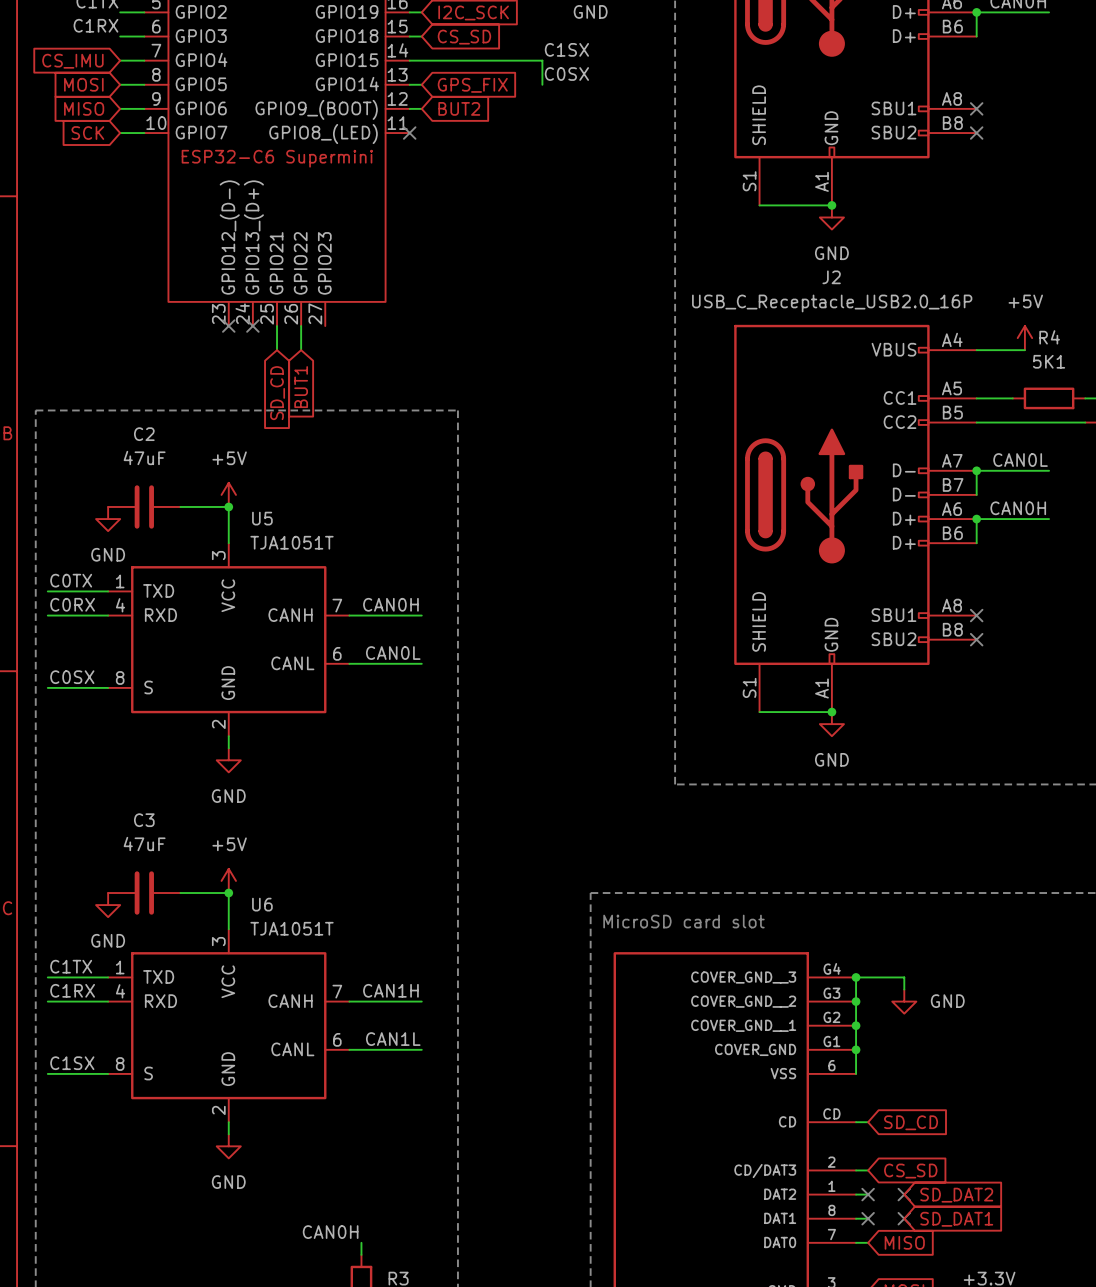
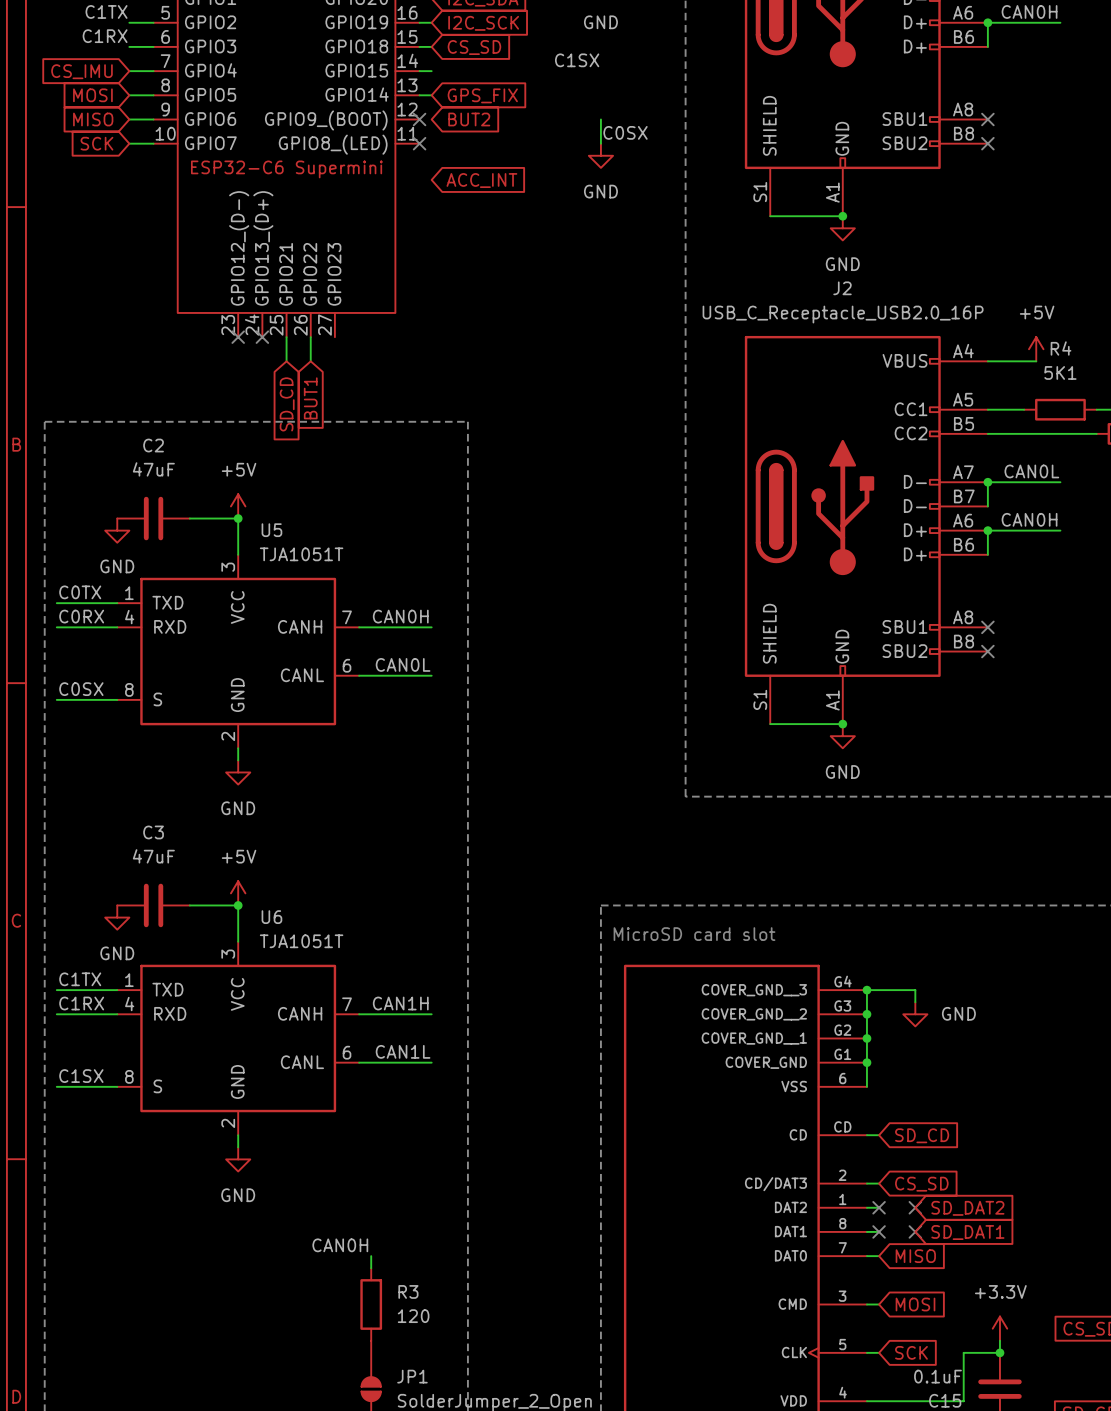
wire: (421, 60) (542, 60) (542, 84) -> none
label position: C0SX (566, 74) -> C0SX (625, 132)
wire: (409, 108) (421, 108) -> none
no-connect mark: none -> (419, 119)
wire: none -> (600, 119) (600, 143)
power symbol: none -> GND (600, 155)
global label: none -> ACC_INT (481, 180)

